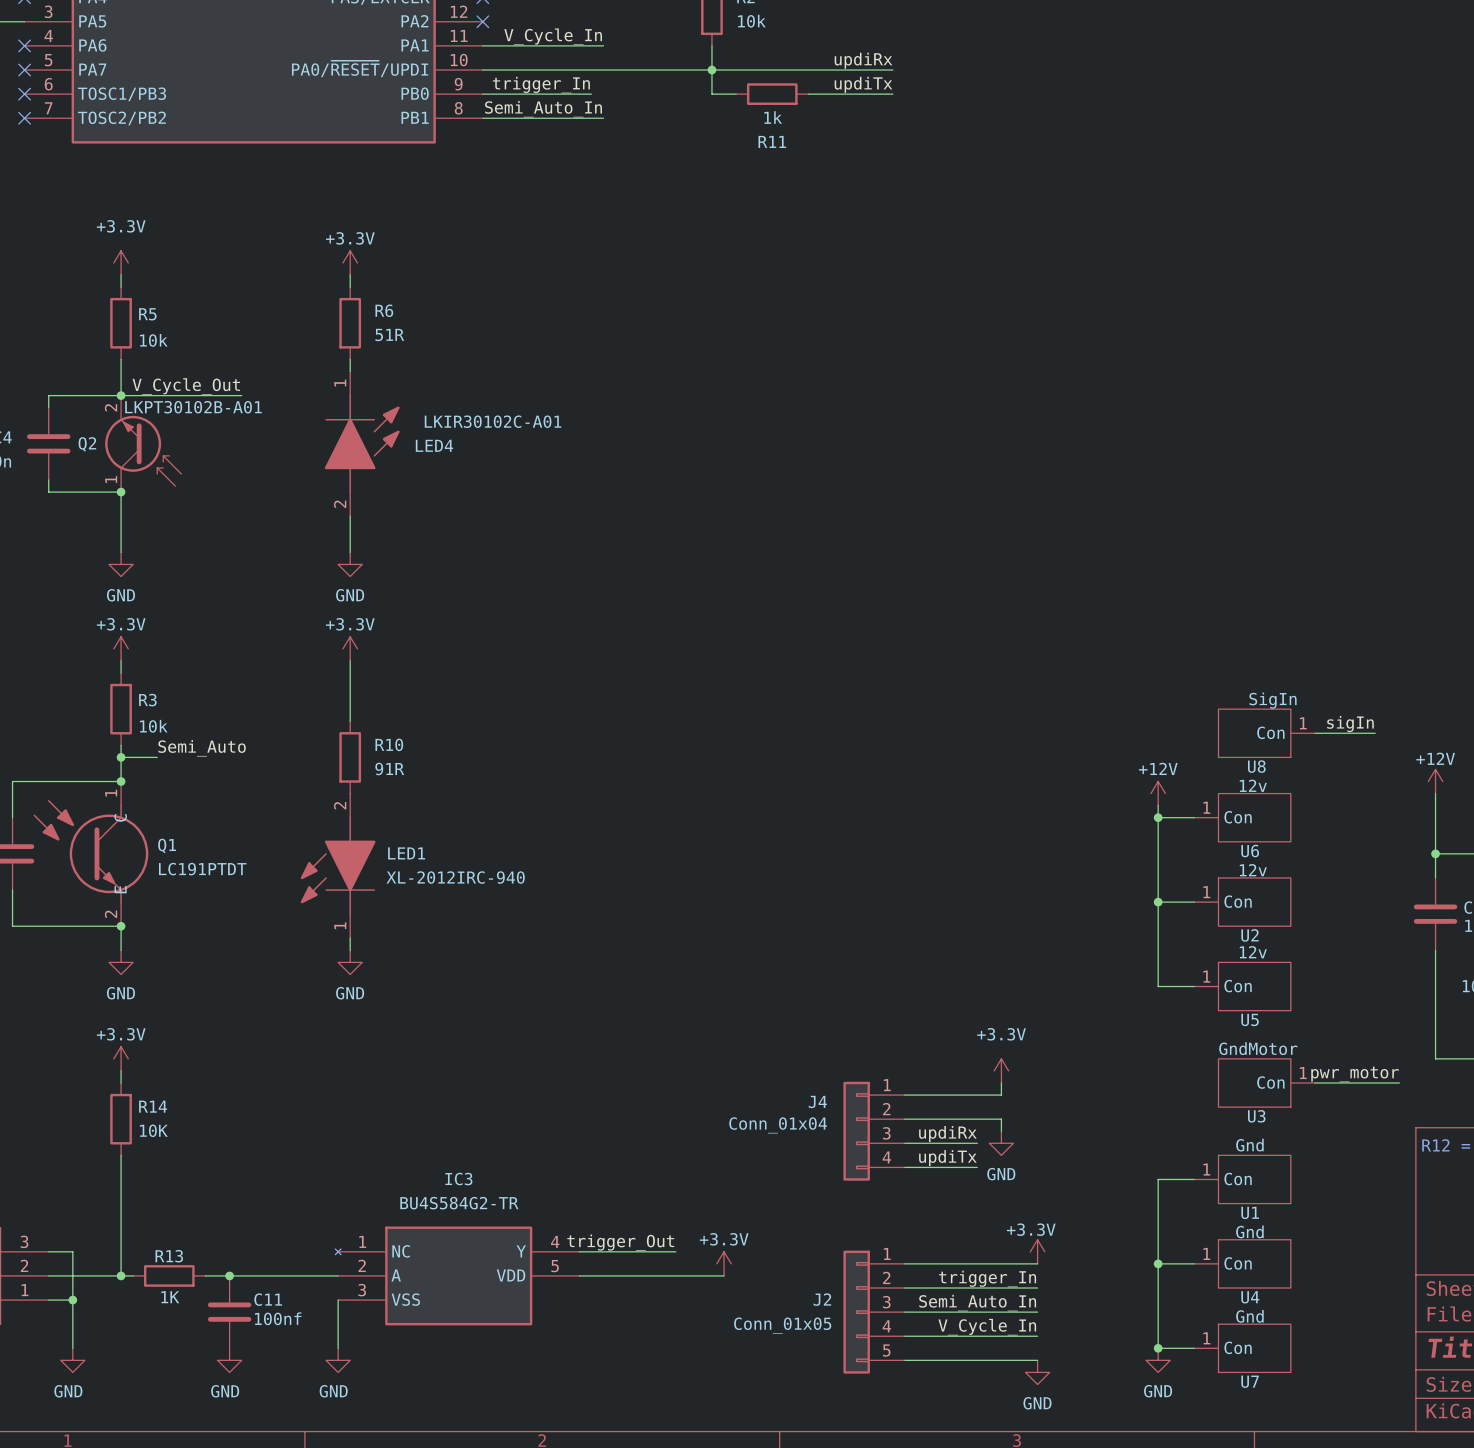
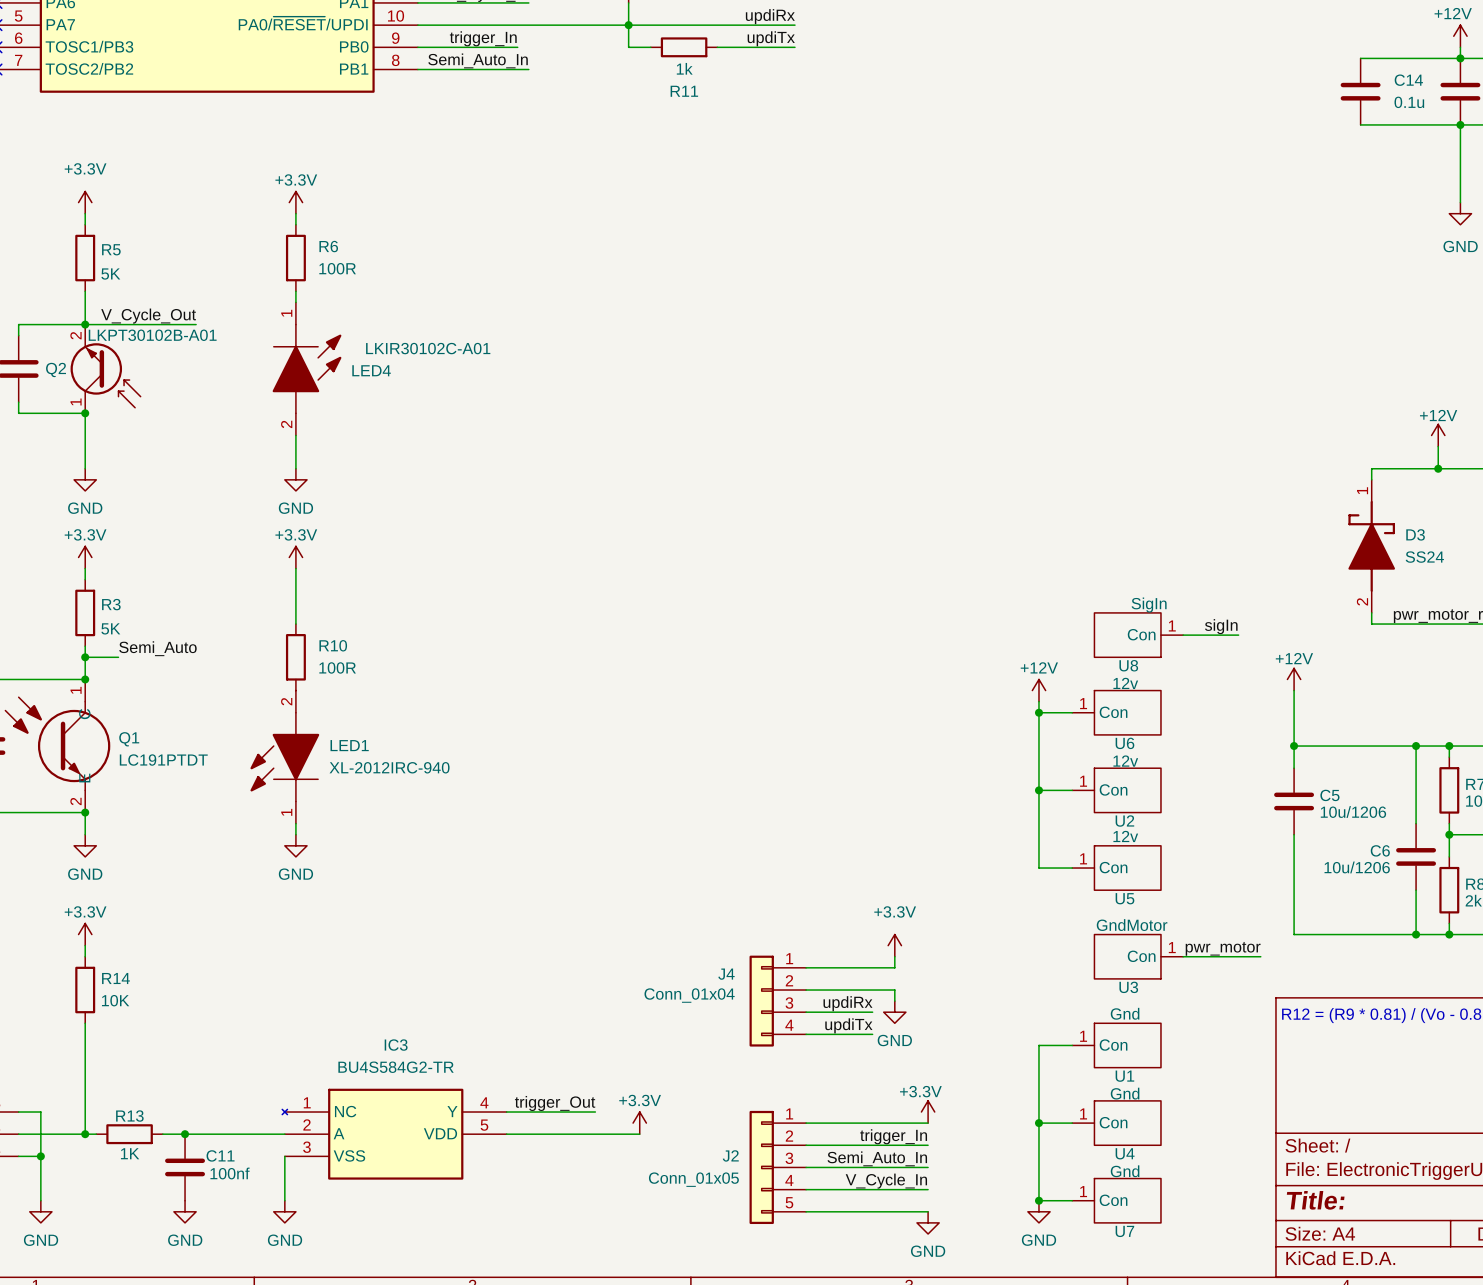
R6 value: 51R (389, 334) -> 100R (337, 268)
R5 value: 10k (153, 340) -> 5K (110, 274)
R3 value: 10k (153, 726) -> 5K (110, 628)
R10 value: 91R (389, 769) -> 100R (337, 667)

